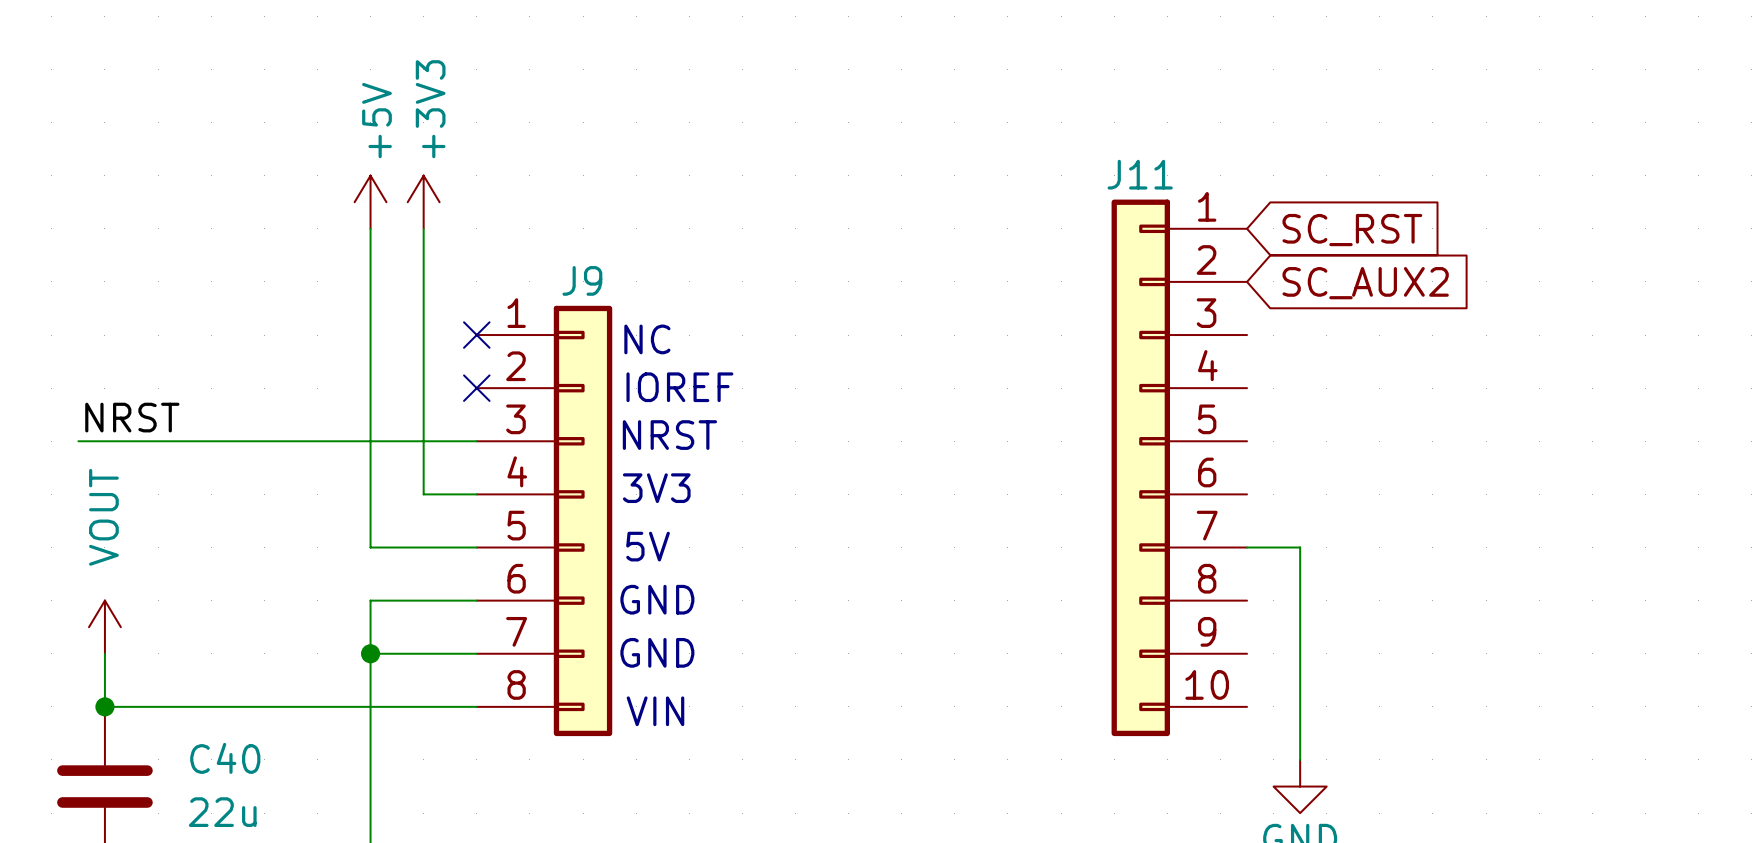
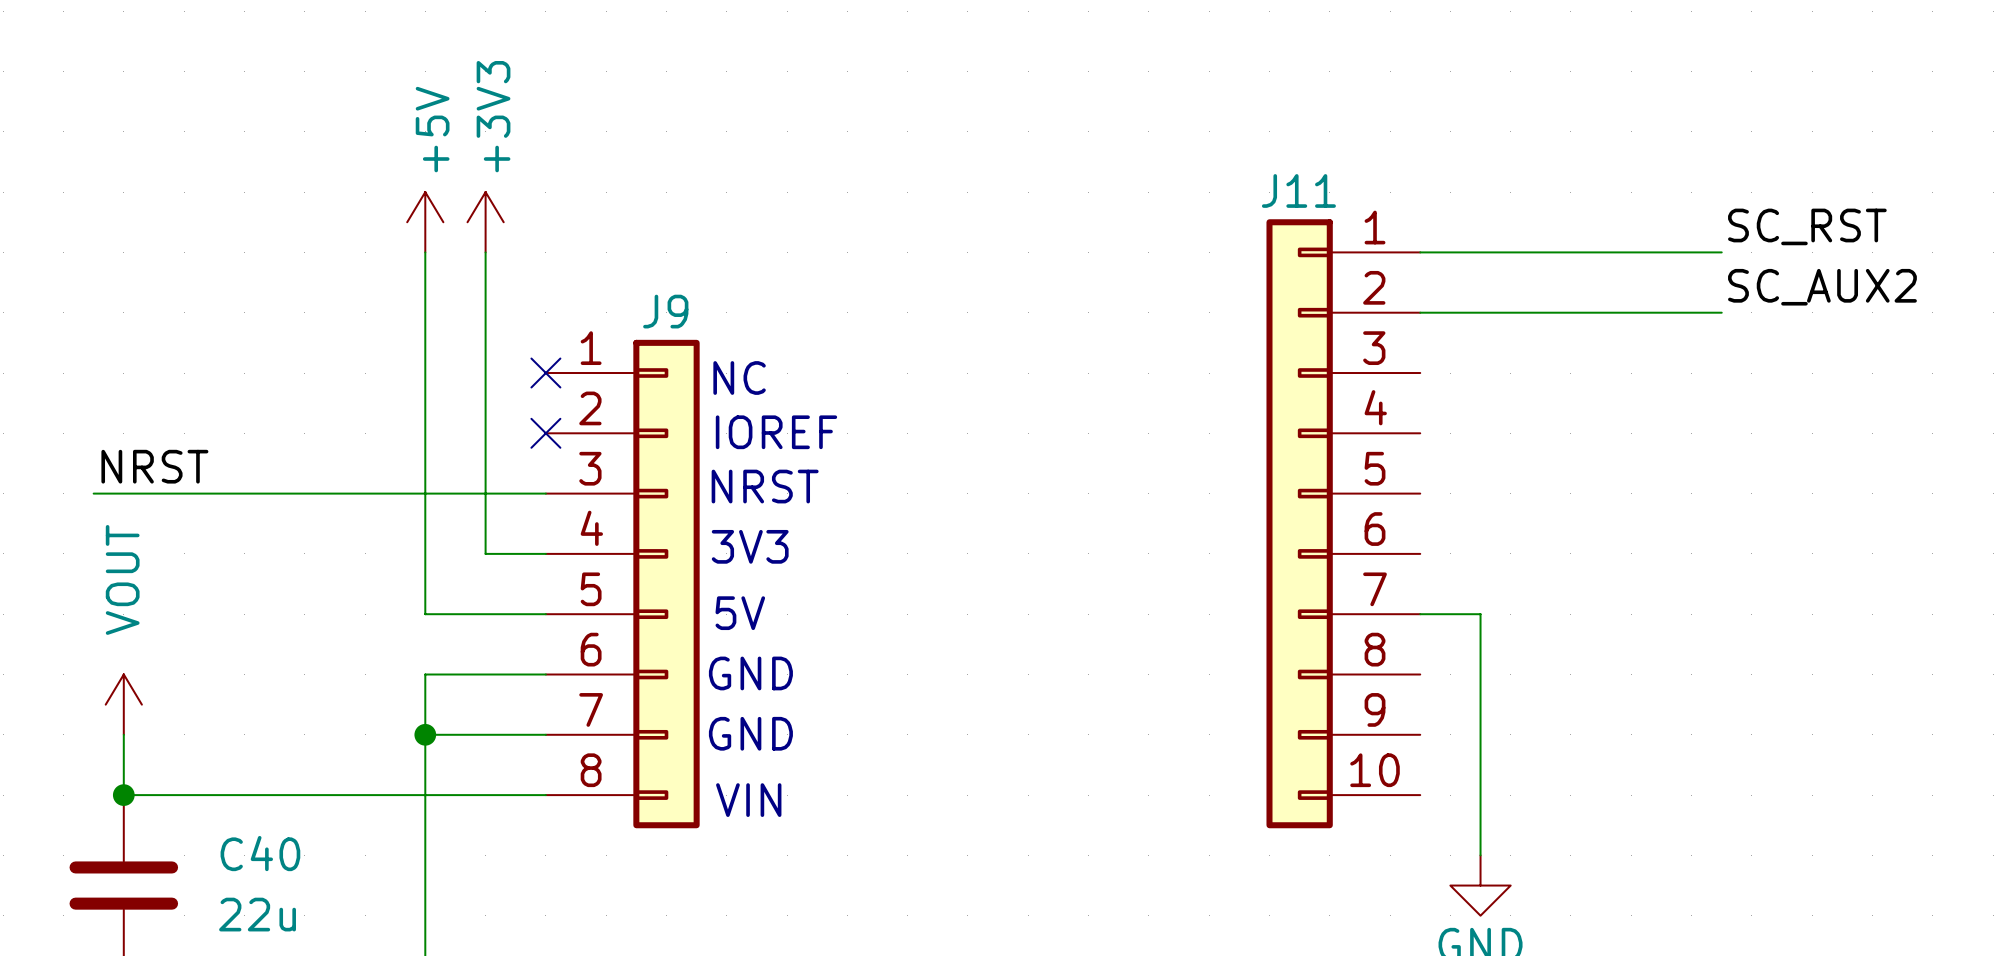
label: none -> SC_RST (1807, 226)
wire: none -> (1420, 252) (1721, 252)
global label: SC_RST (1352, 230) -> none
label: none -> SC_AUX2 (1822, 287)
wire: none -> (1420, 312) (1721, 312)
global label: SC_AUX2 (1365, 283) -> none

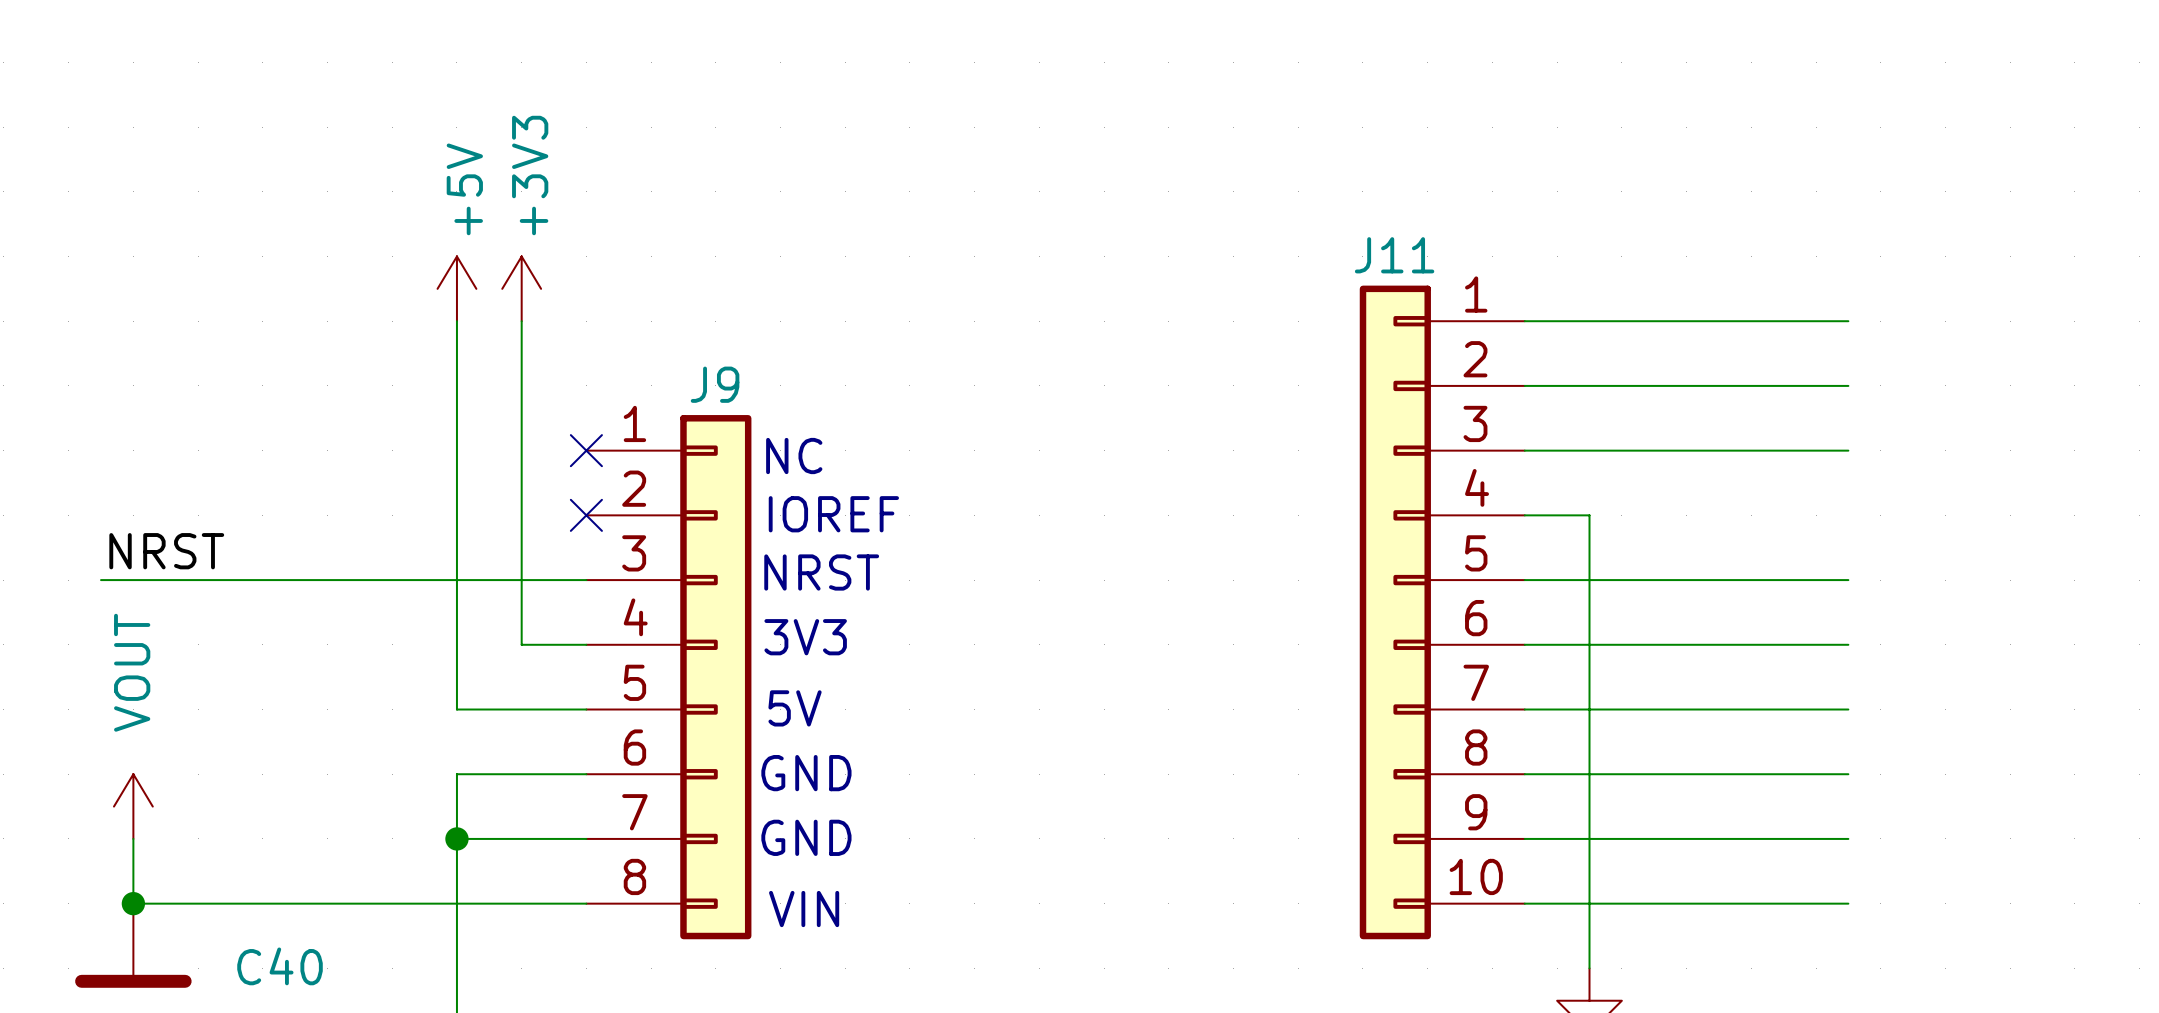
label: SC_RST (1807, 226) -> none
label: SC_AUX2 (1822, 287) -> none
wire: none -> (1524, 450) (1848, 450)
wire: none -> (1524, 515) (1589, 515) (1589, 709) (1848, 709)
wire: none -> (1524, 580) (1848, 580)
wire: none -> (1524, 644) (1848, 644)
wire: none -> (1524, 774) (1848, 774)
wire: none -> (1524, 838) (1848, 838)
wire: none -> (1524, 903) (1848, 903)

